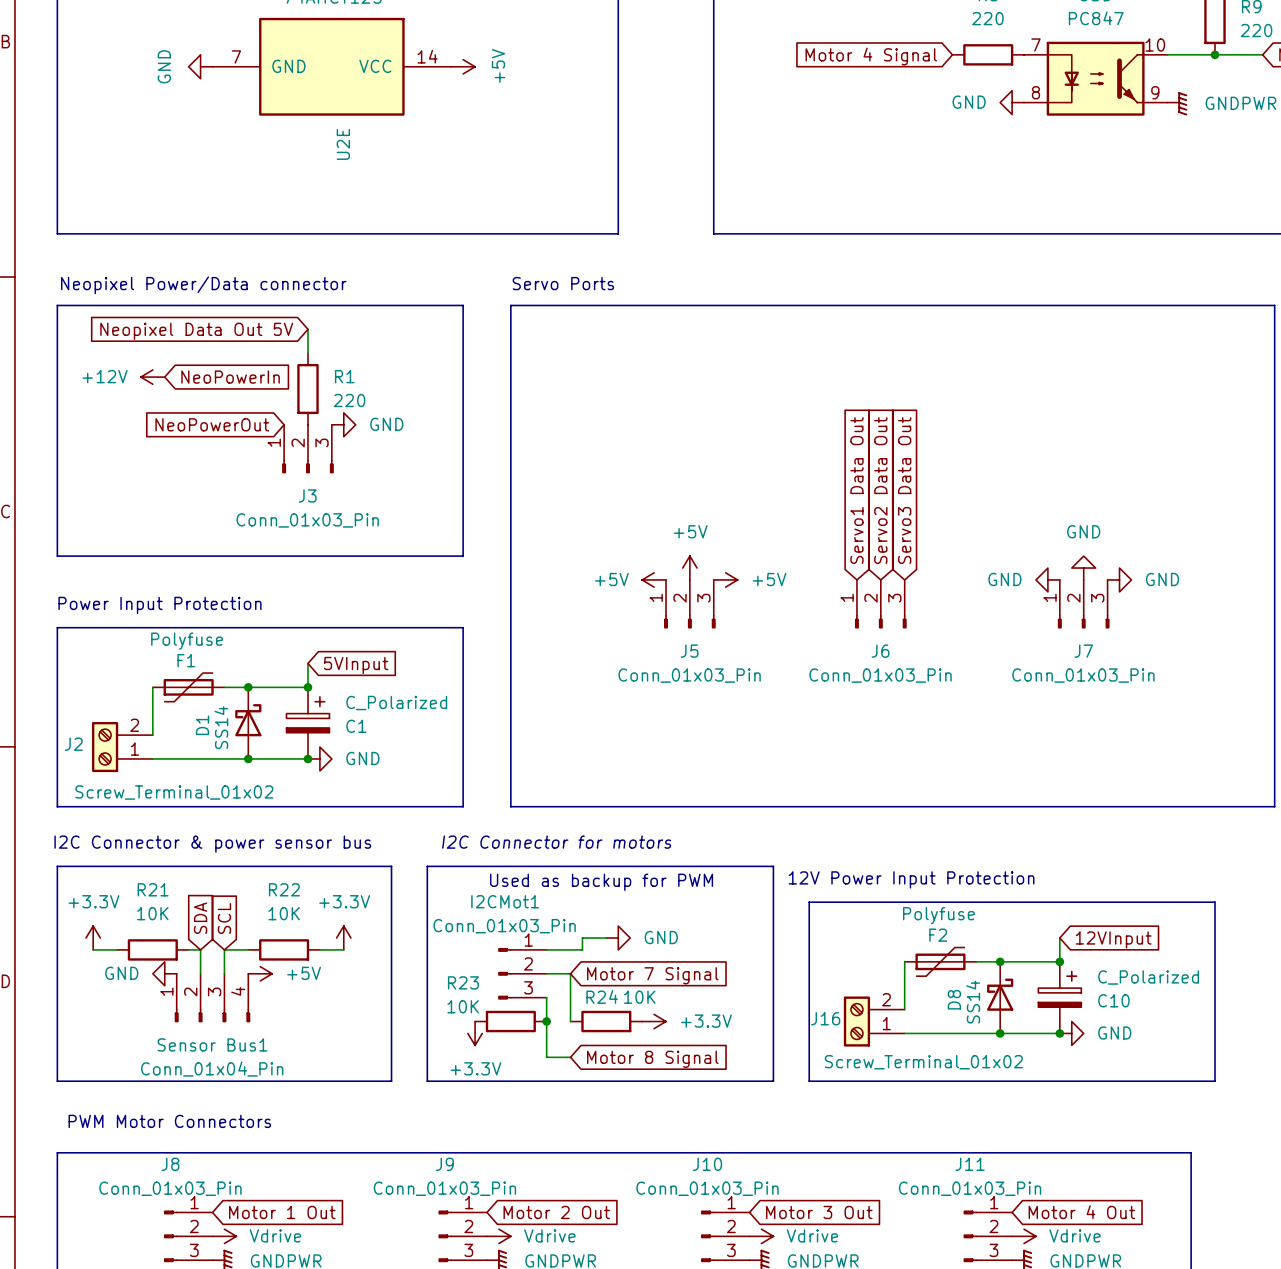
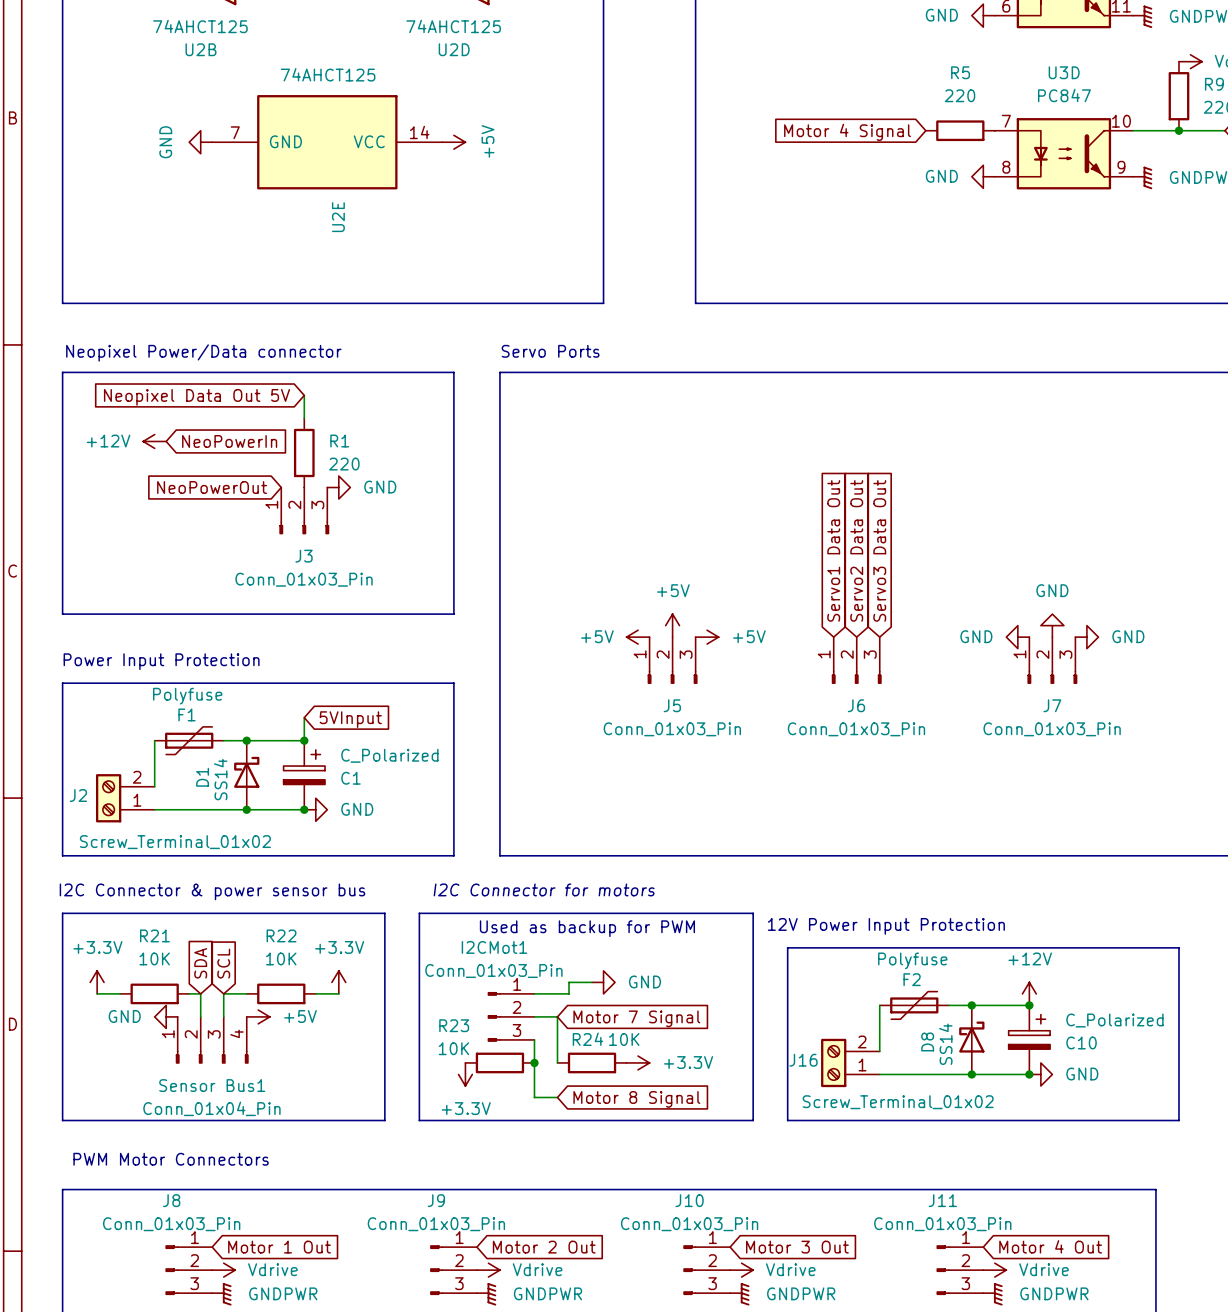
global label: 12VInput (1113, 939) -> none
power symbol: none -> +12V (1029, 993)

